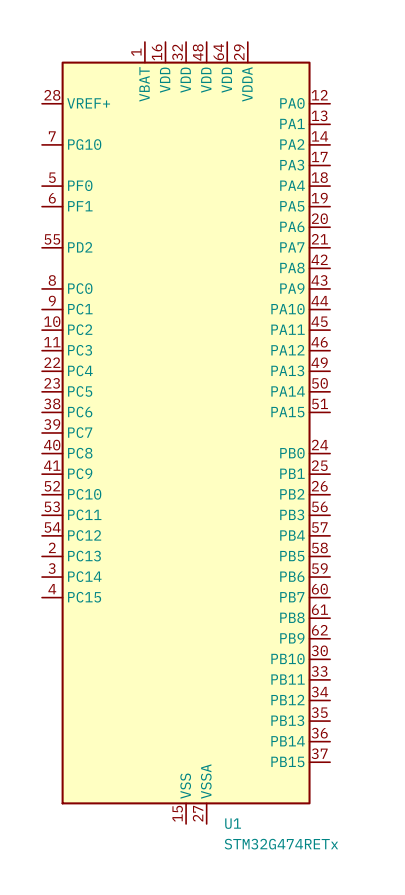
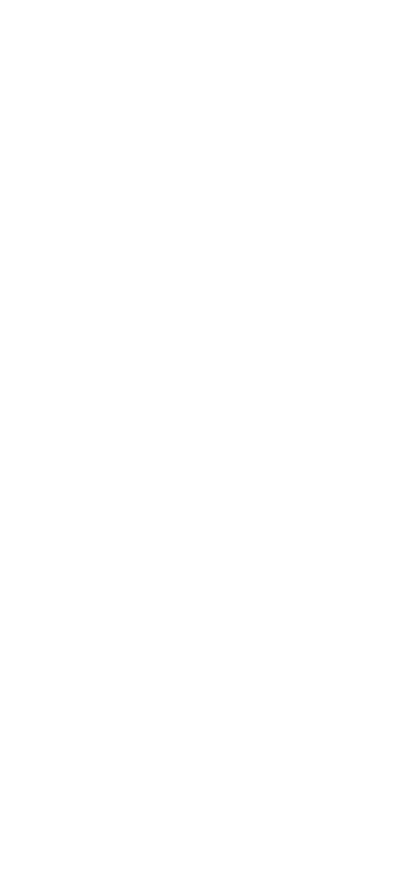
U1: STM32G474RETx (186, 432) -> none

